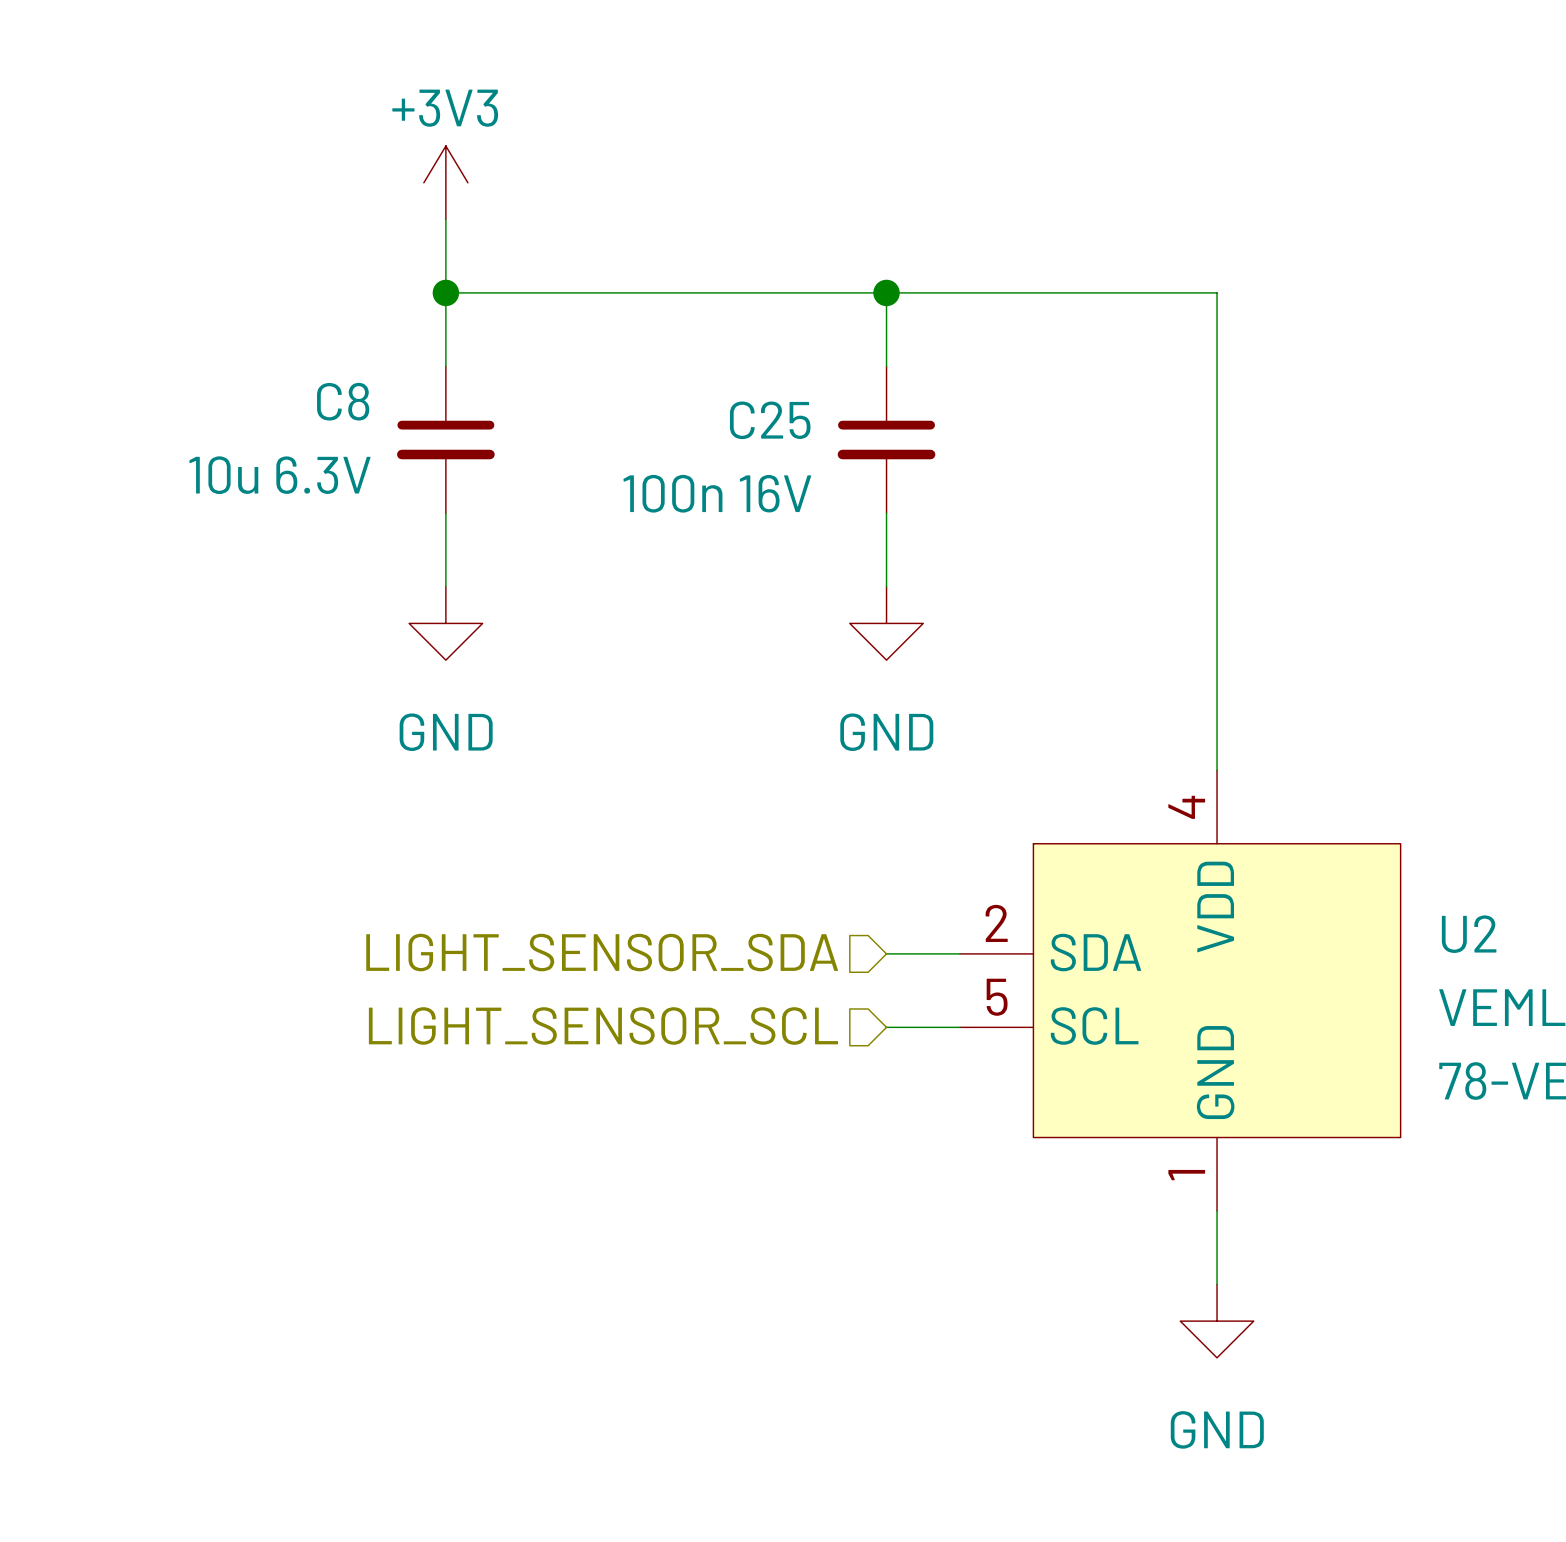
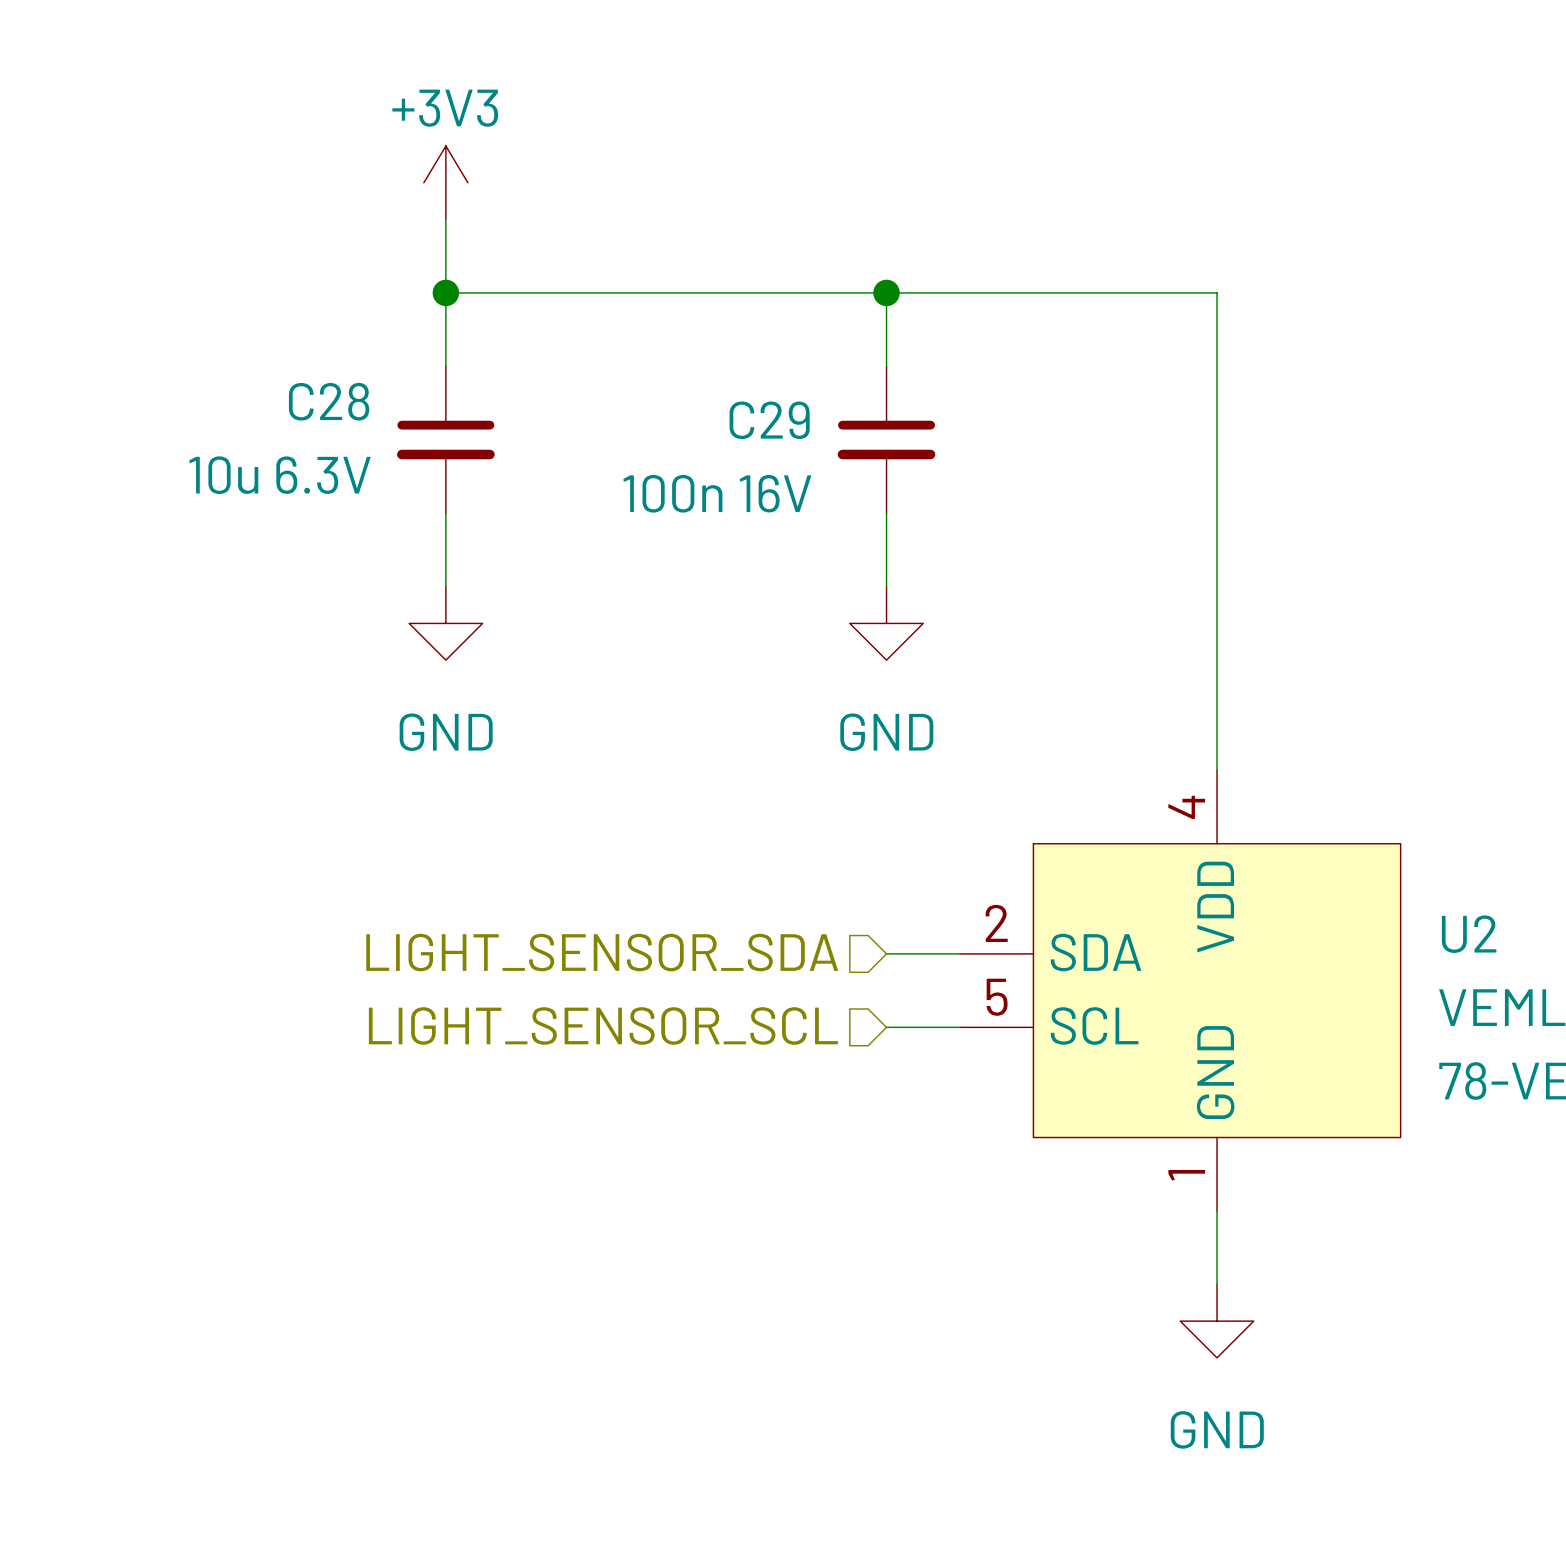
C8 name: C8 (343, 401) -> C28 (329, 401)
C25 name: C25 (770, 420) -> C29 (769, 420)

